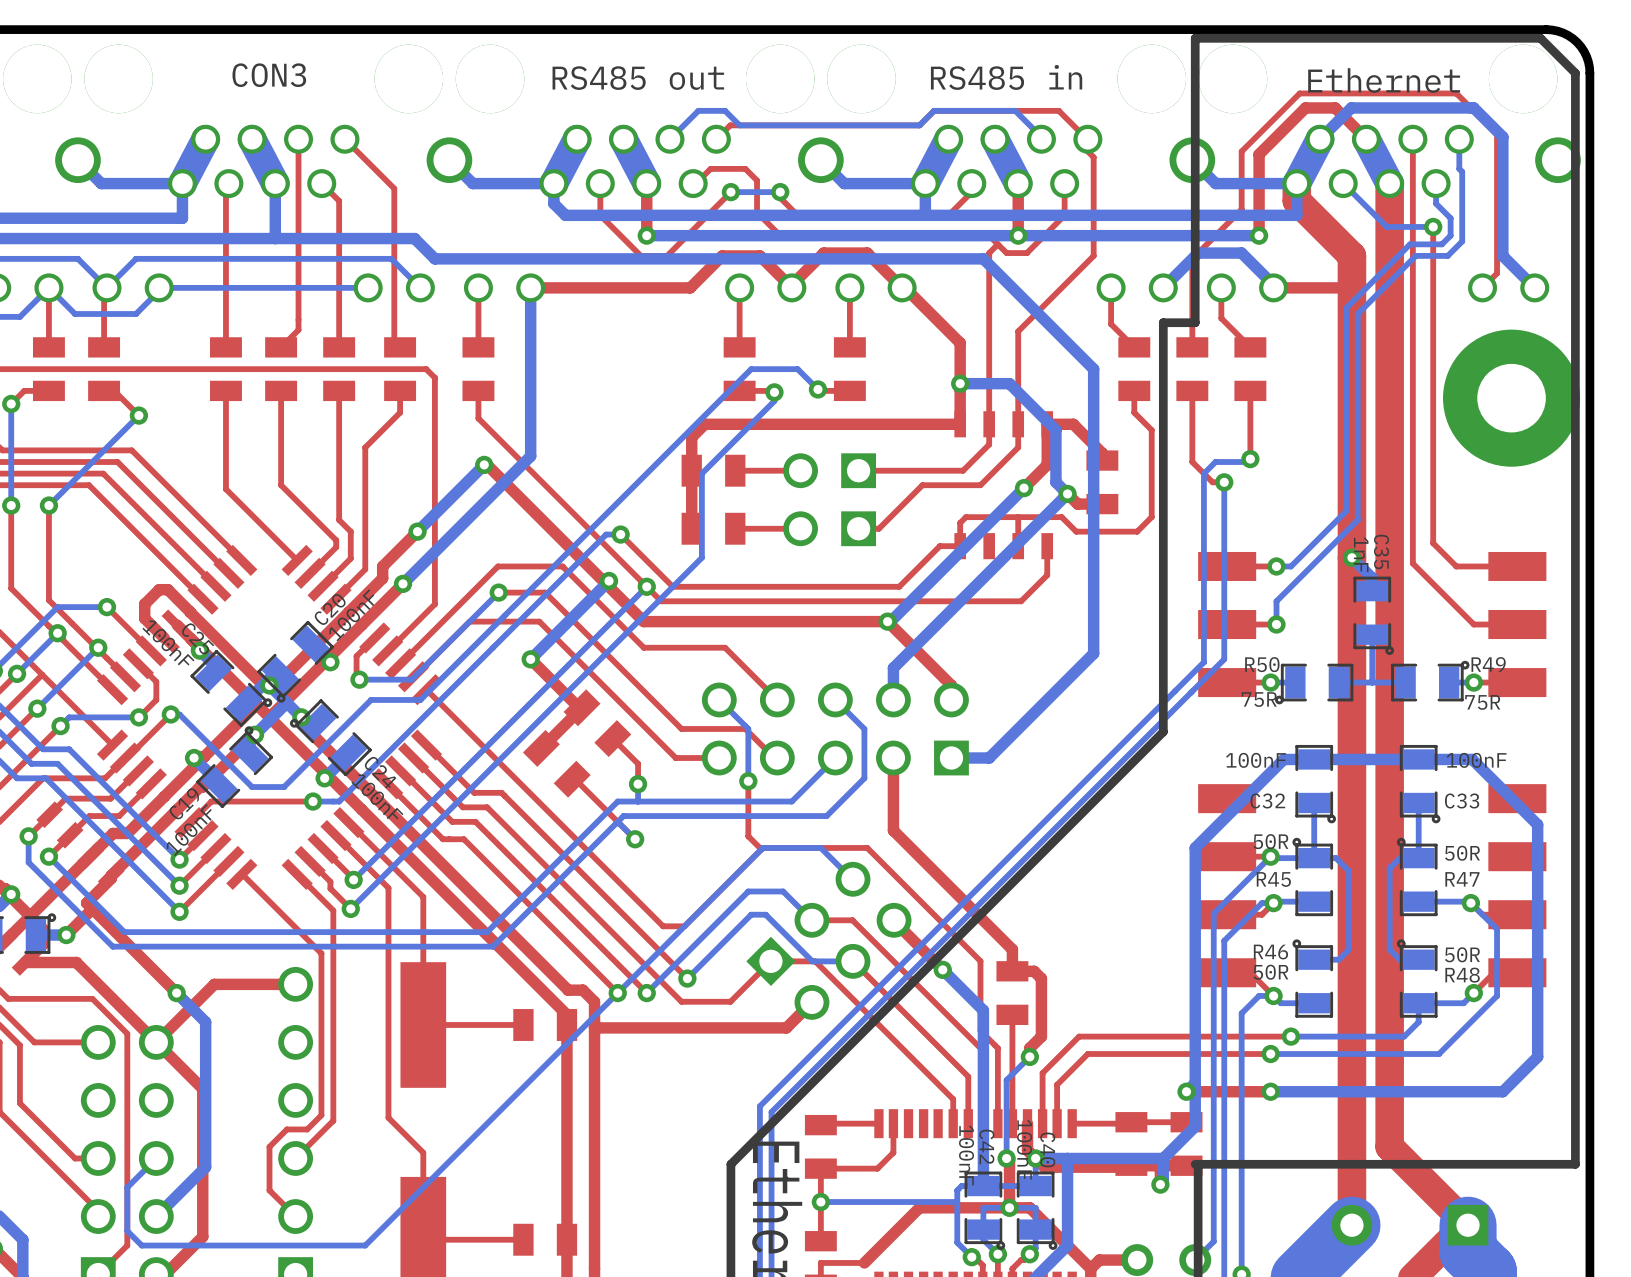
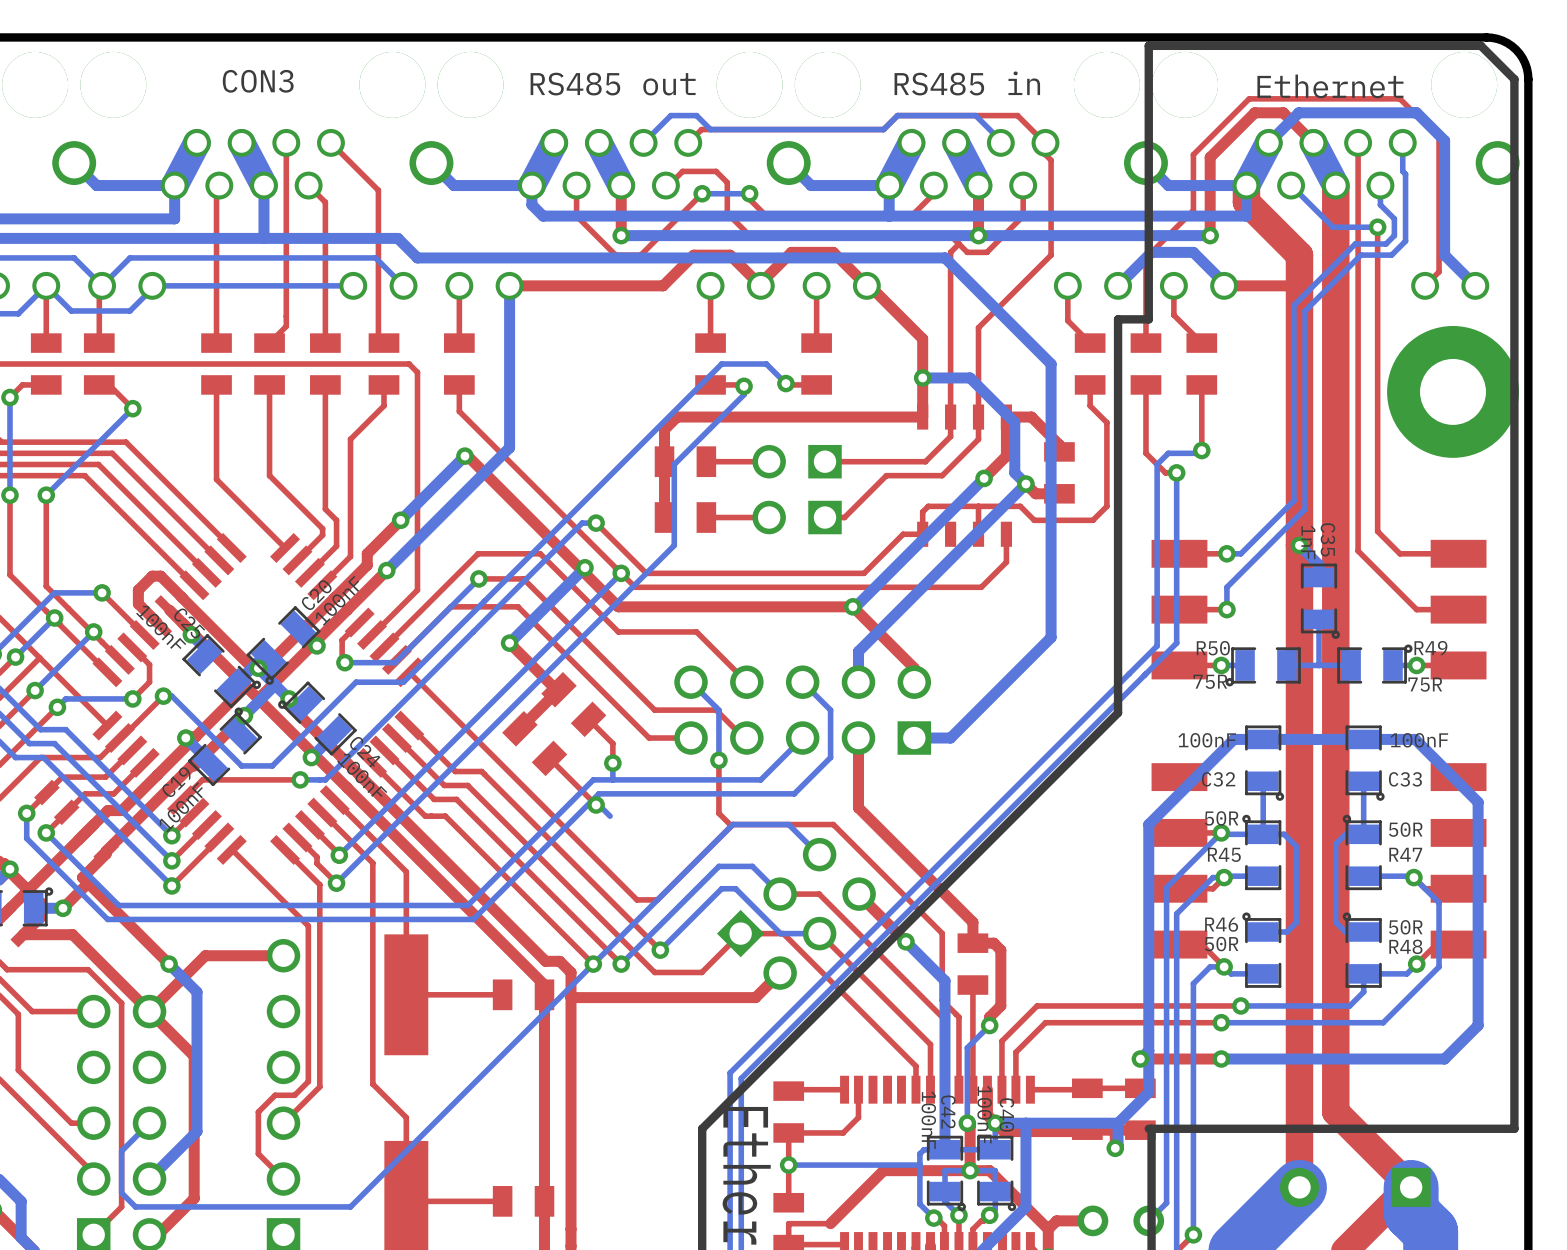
top track: (572, 779) (575, 779) (635, 839) -> (549, 758) (596, 805)
via position: (635, 839) -> (596, 805)

